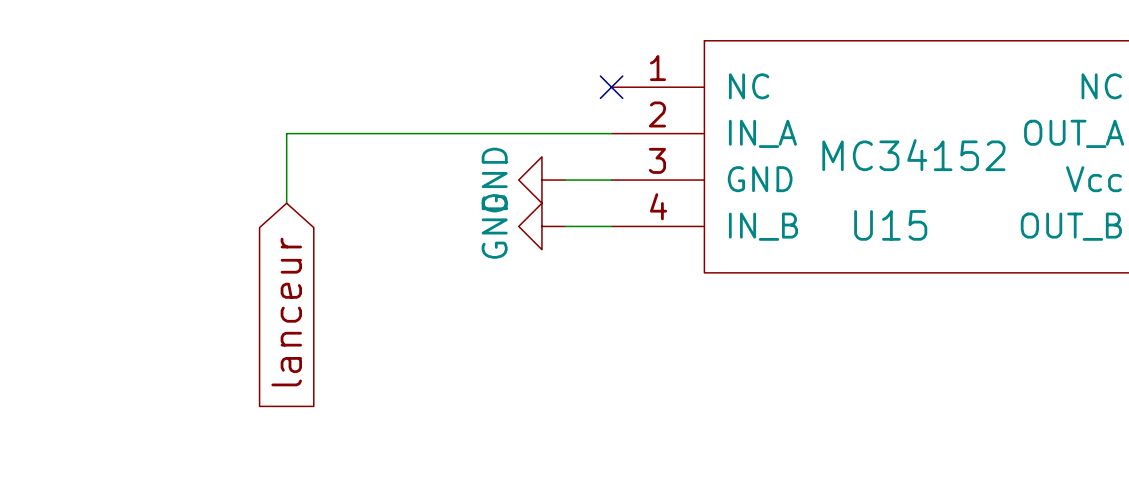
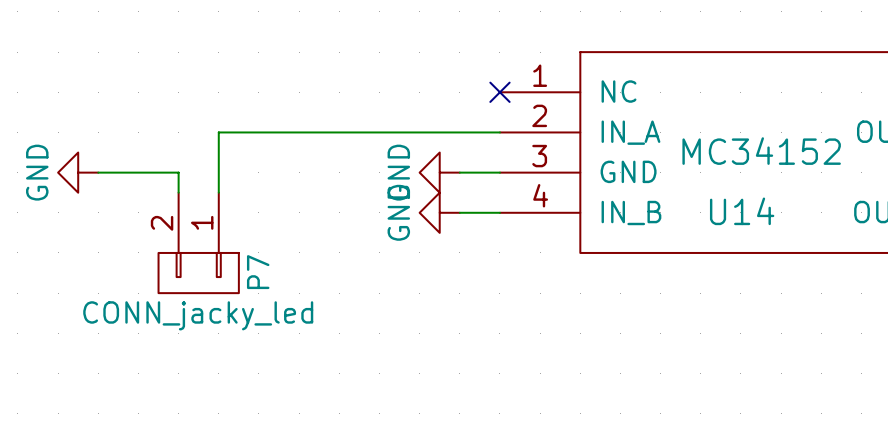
power symbol: none -> GND (78, 172)
wire: none -> (98, 172) (178, 172) (178, 192)
U15 name: U15 (890, 225) -> U14 (742, 211)
P7: none -> CONN_jacky_led (198, 242)
global label: lanceur (286, 311) -> none

